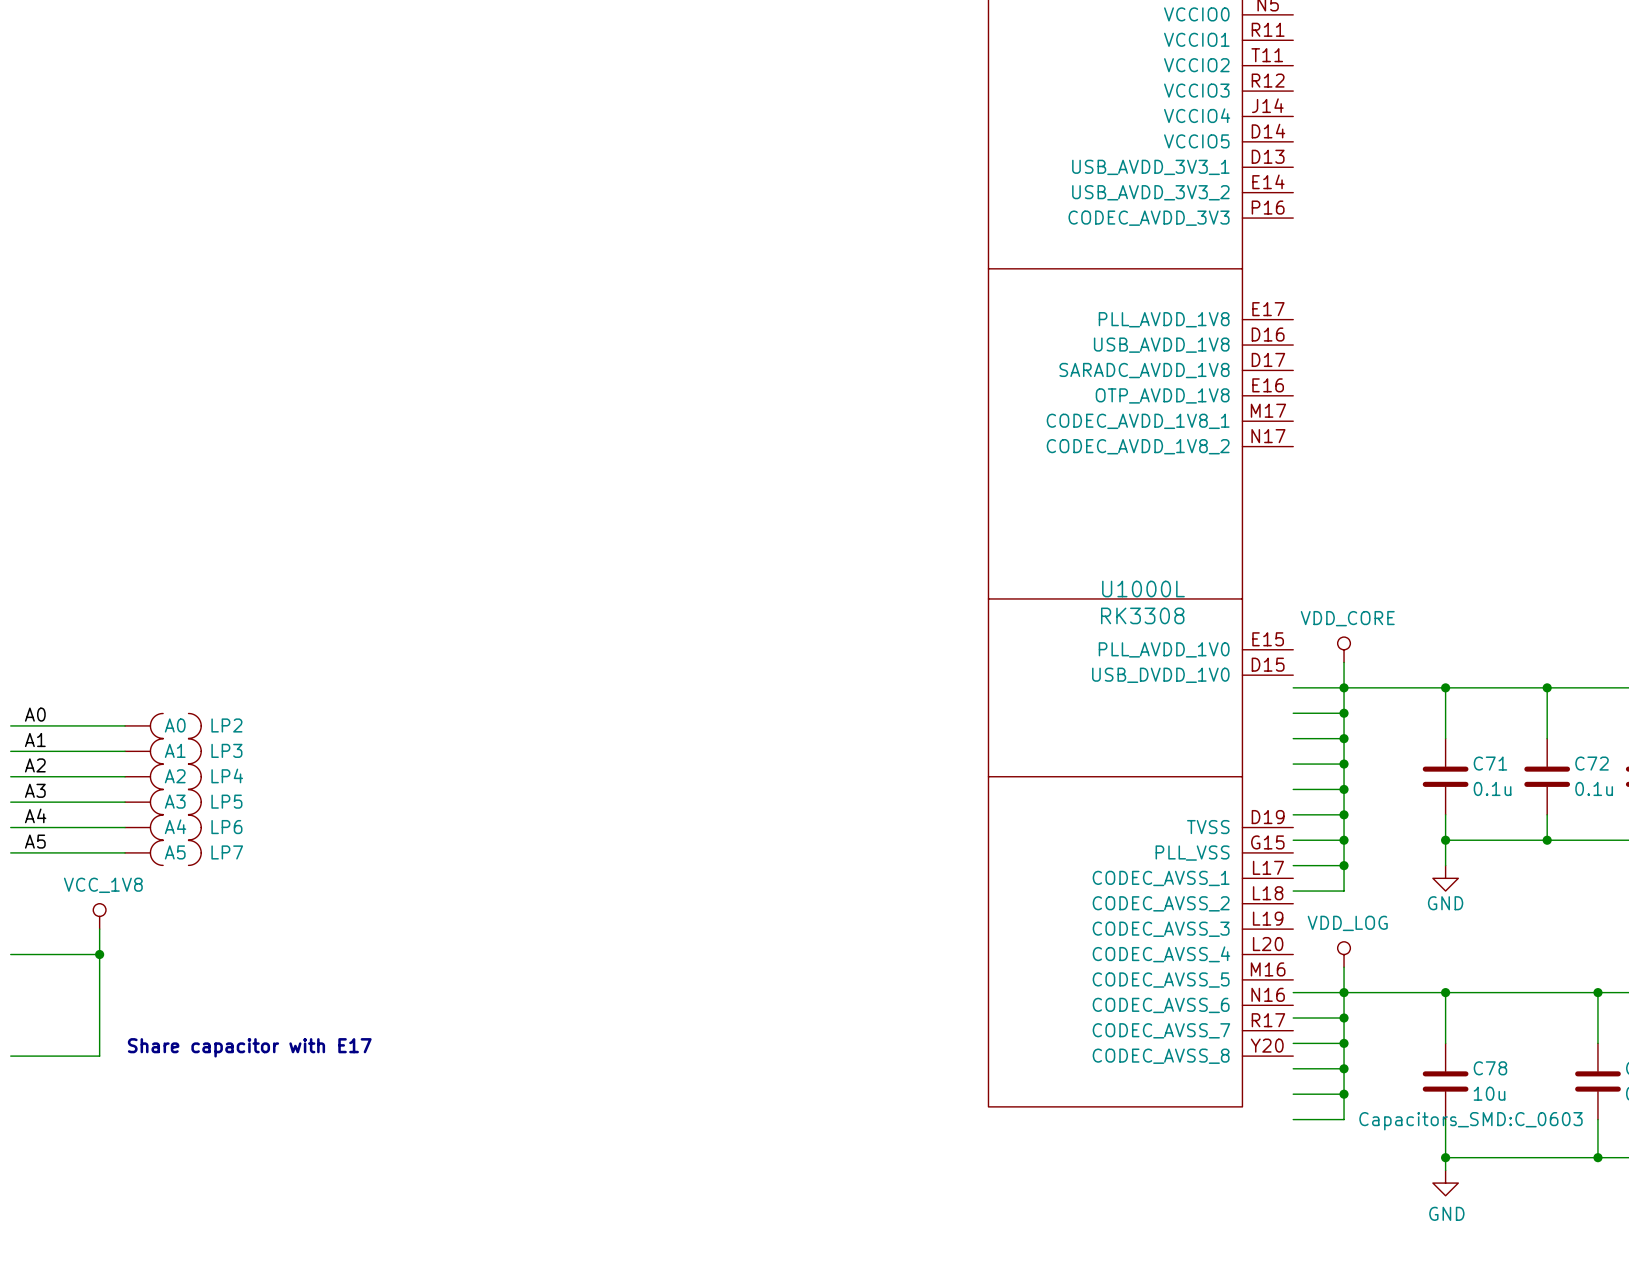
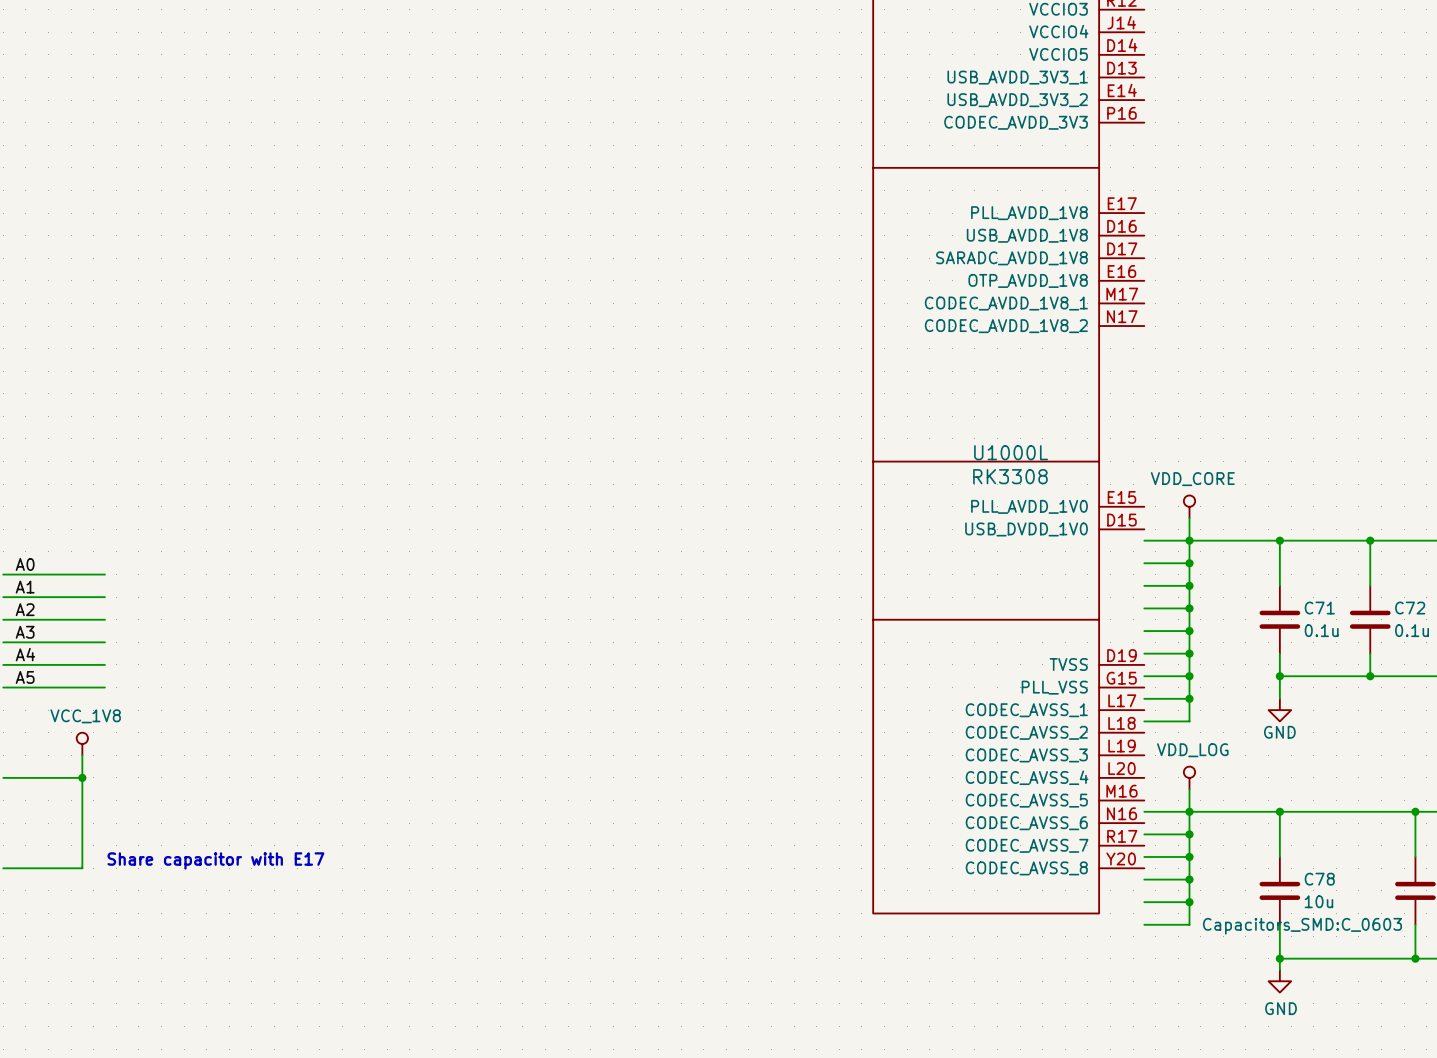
LP2: A0 (163, 725) -> none
LP3: A1 (163, 751) -> none
LP4: A2 (163, 776) -> none
LP5: A3 (163, 802) -> none
LP6: A4 (163, 827) -> none
LP7: A5 (163, 852) -> none

